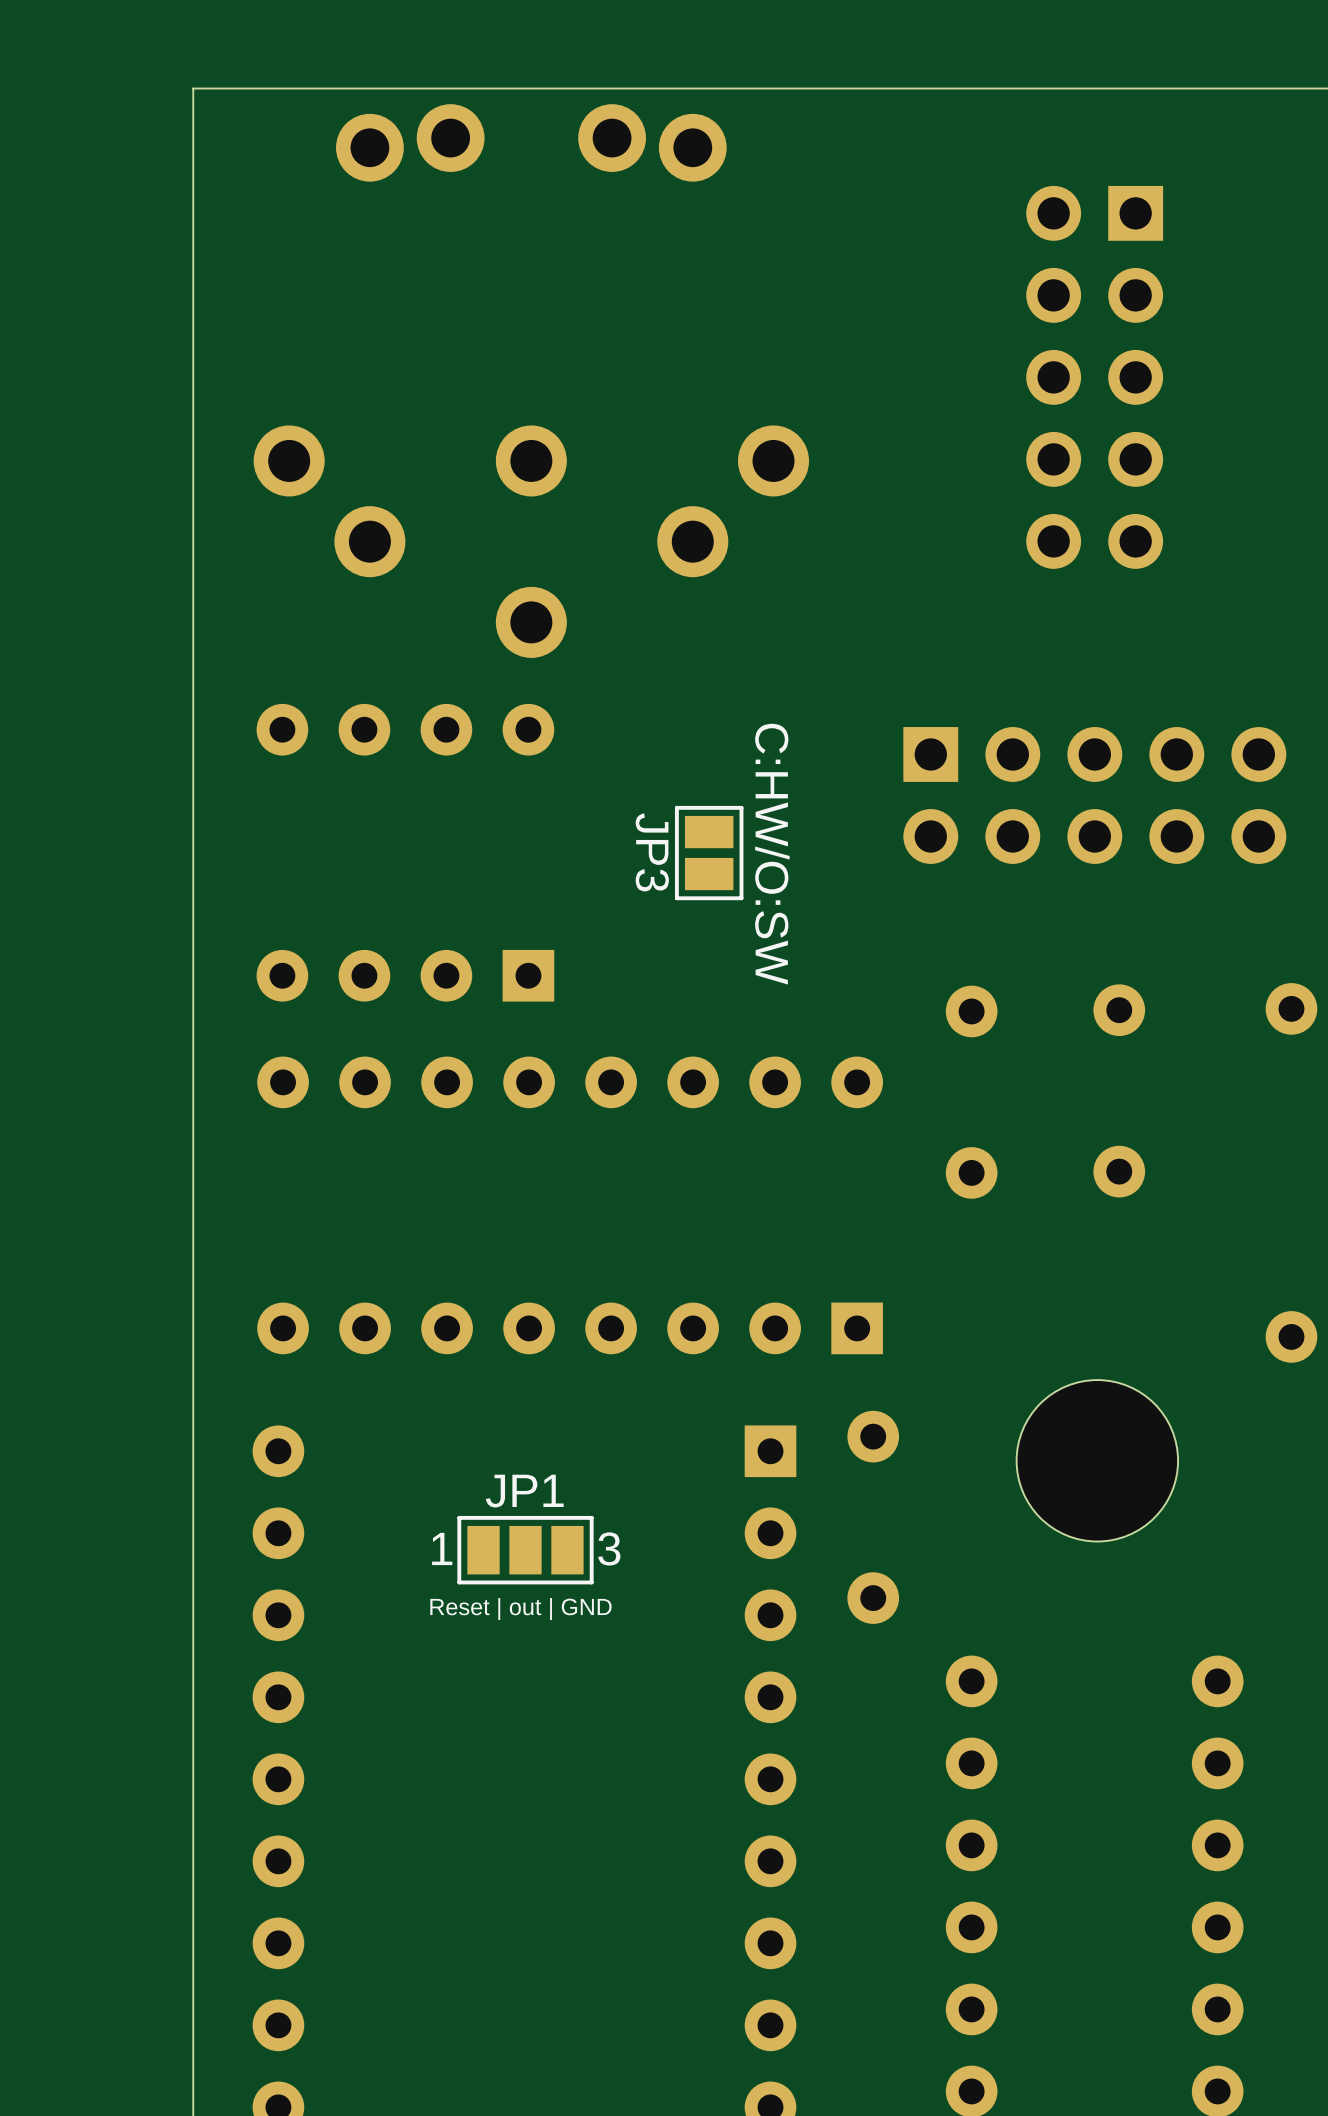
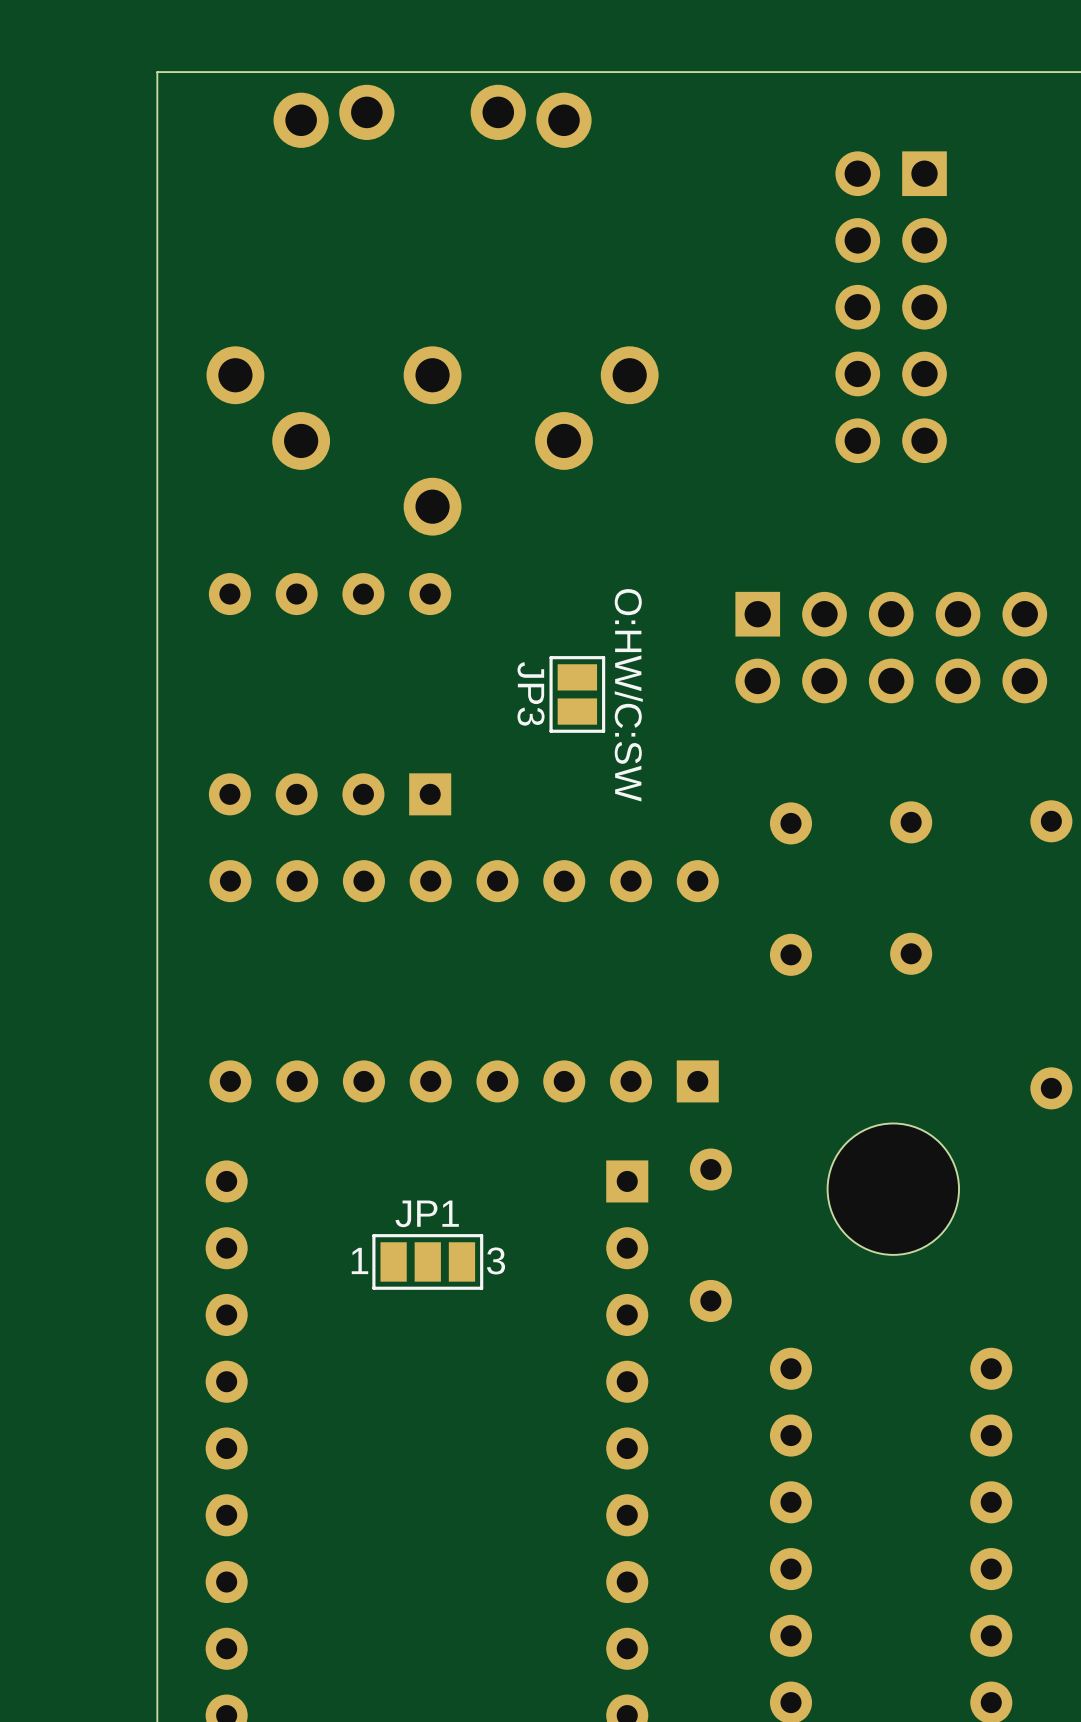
JP3 value: C:HW/O:SW (772, 854) -> O:HW/C:SW (628, 695)
text: Reset | out | GND (520, 1609) -> none

